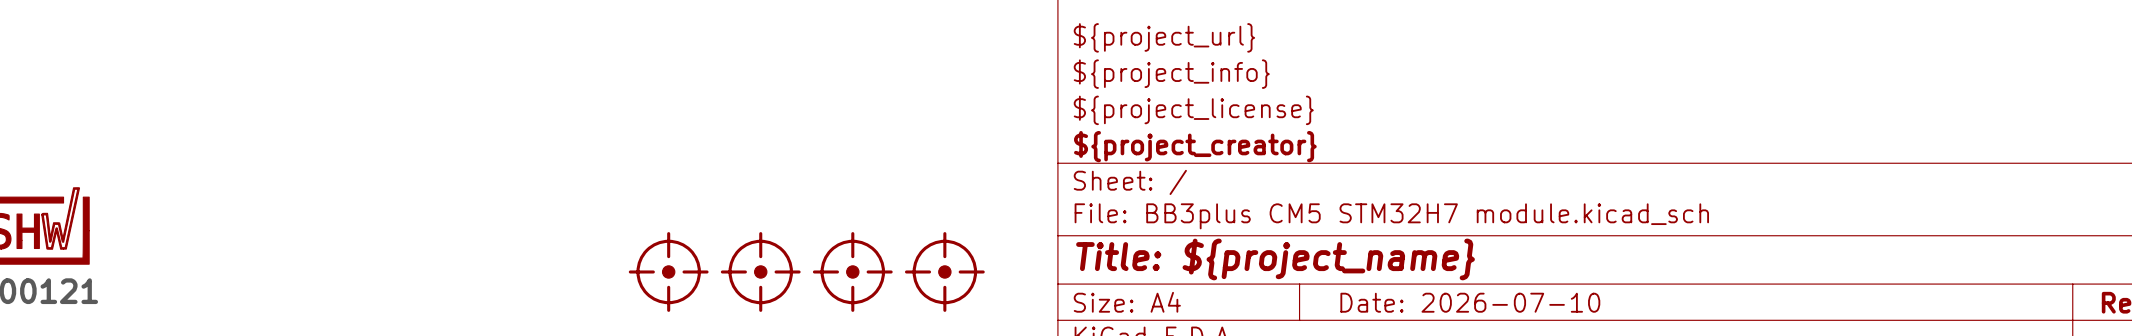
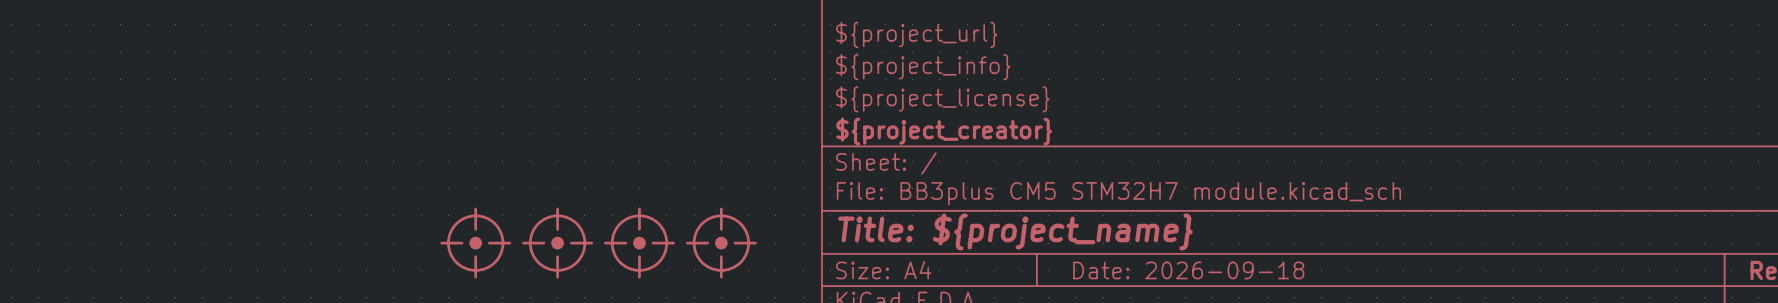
title block: Date: 2026-07-10 (1470, 302) -> Date: 2026-09-18 (1188, 270)

